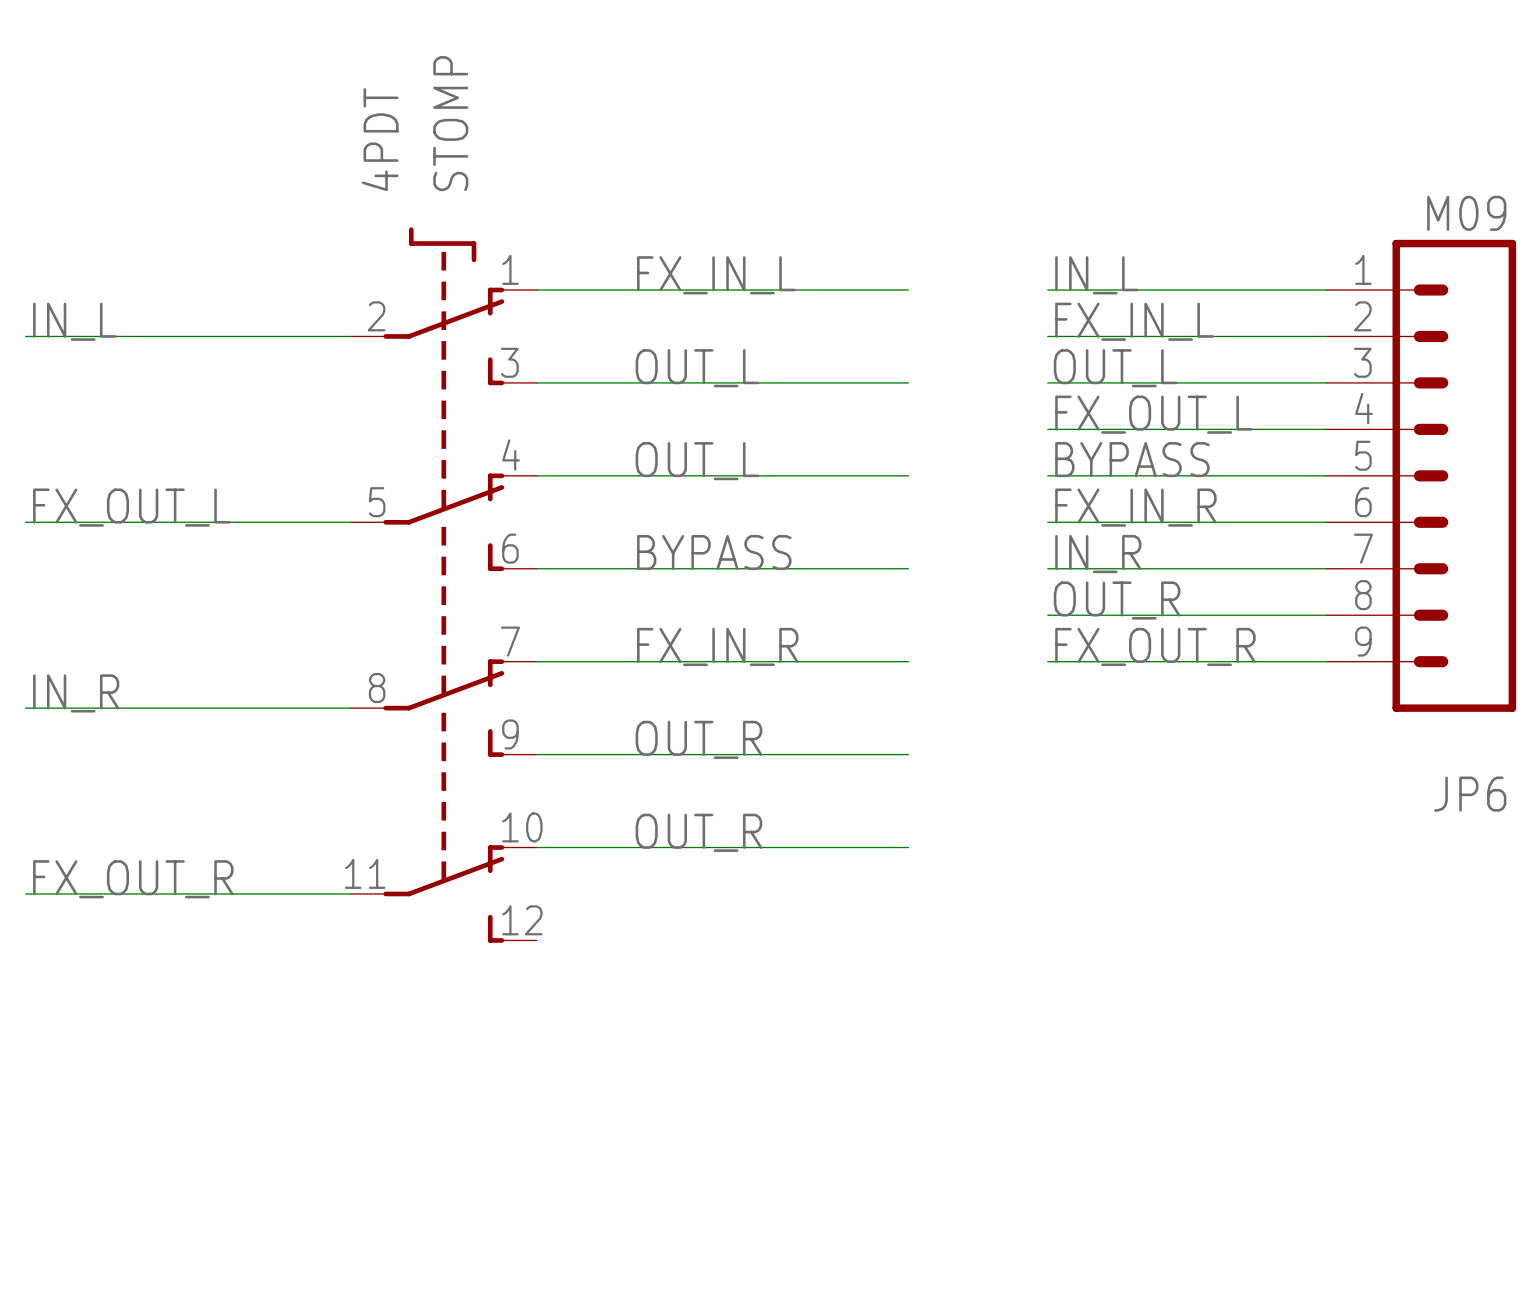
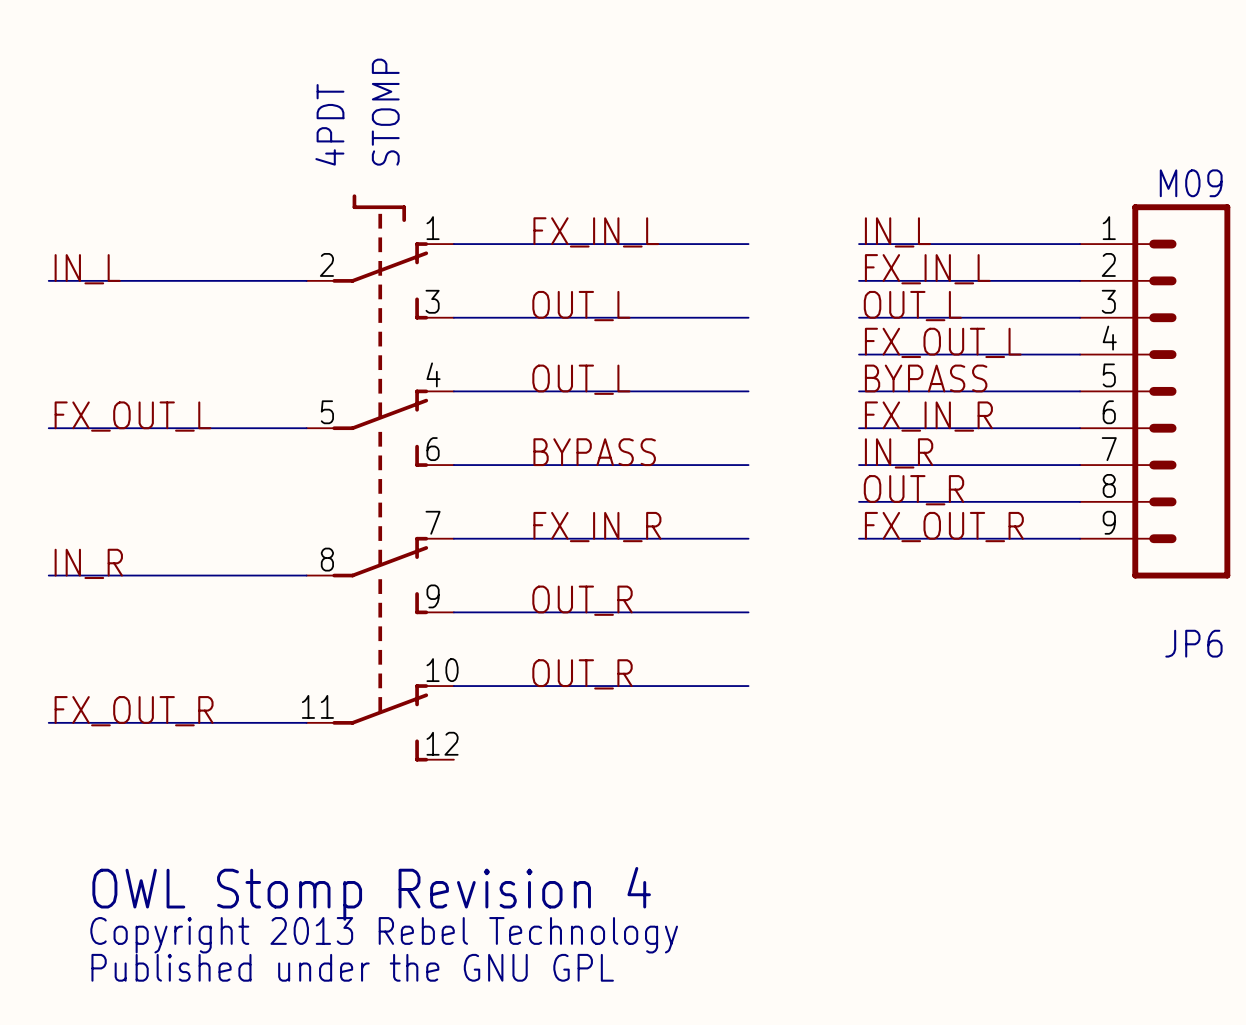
text: none -> OWL Stomp Revision 4 (371, 893)
text: none -> Copyright 2013 Rebel Technology (384, 935)
text: none -> Published under the GNU GPL (352, 967)

